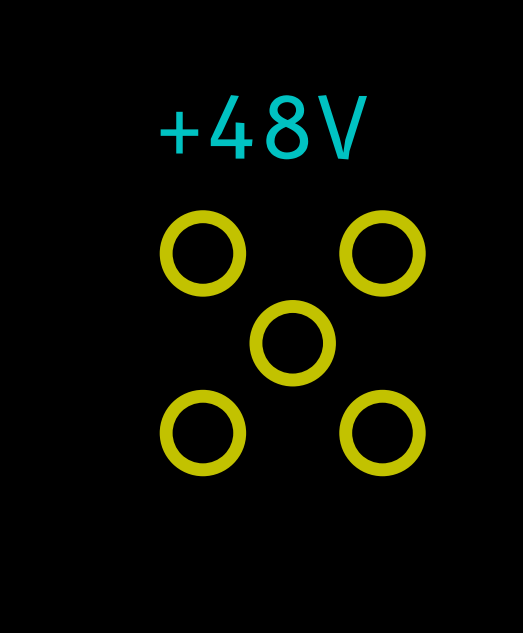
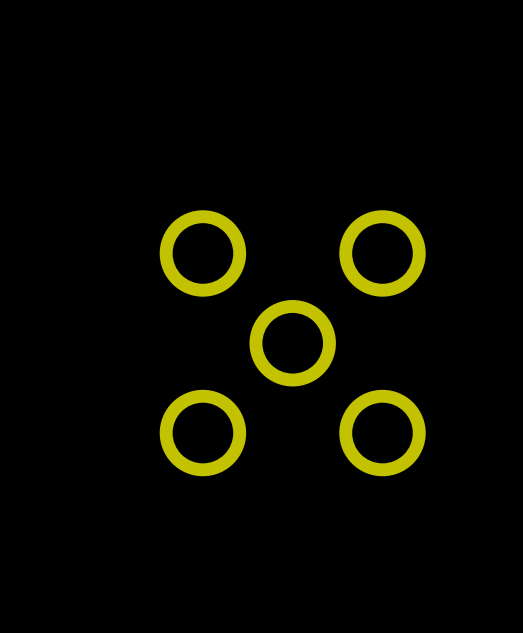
text: +48V (263, 127) -> none

